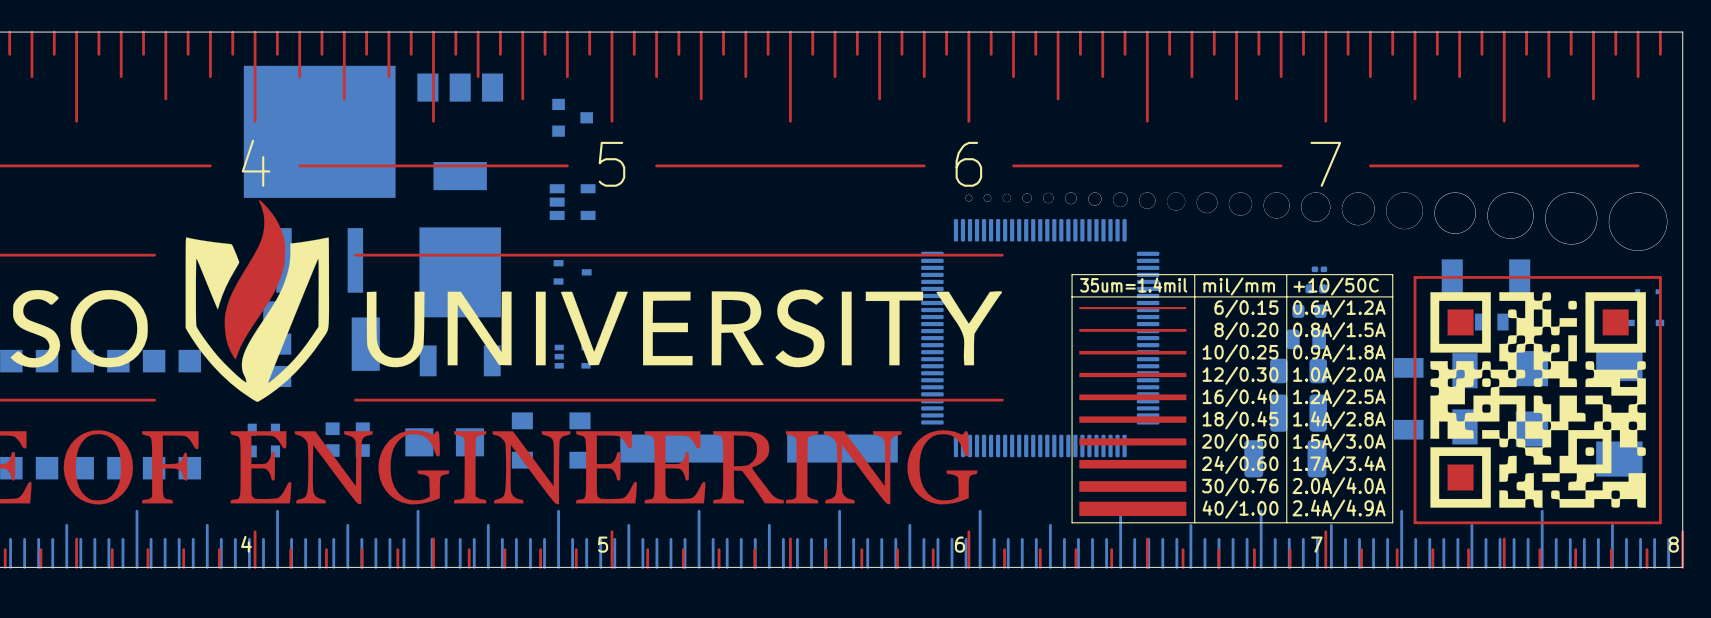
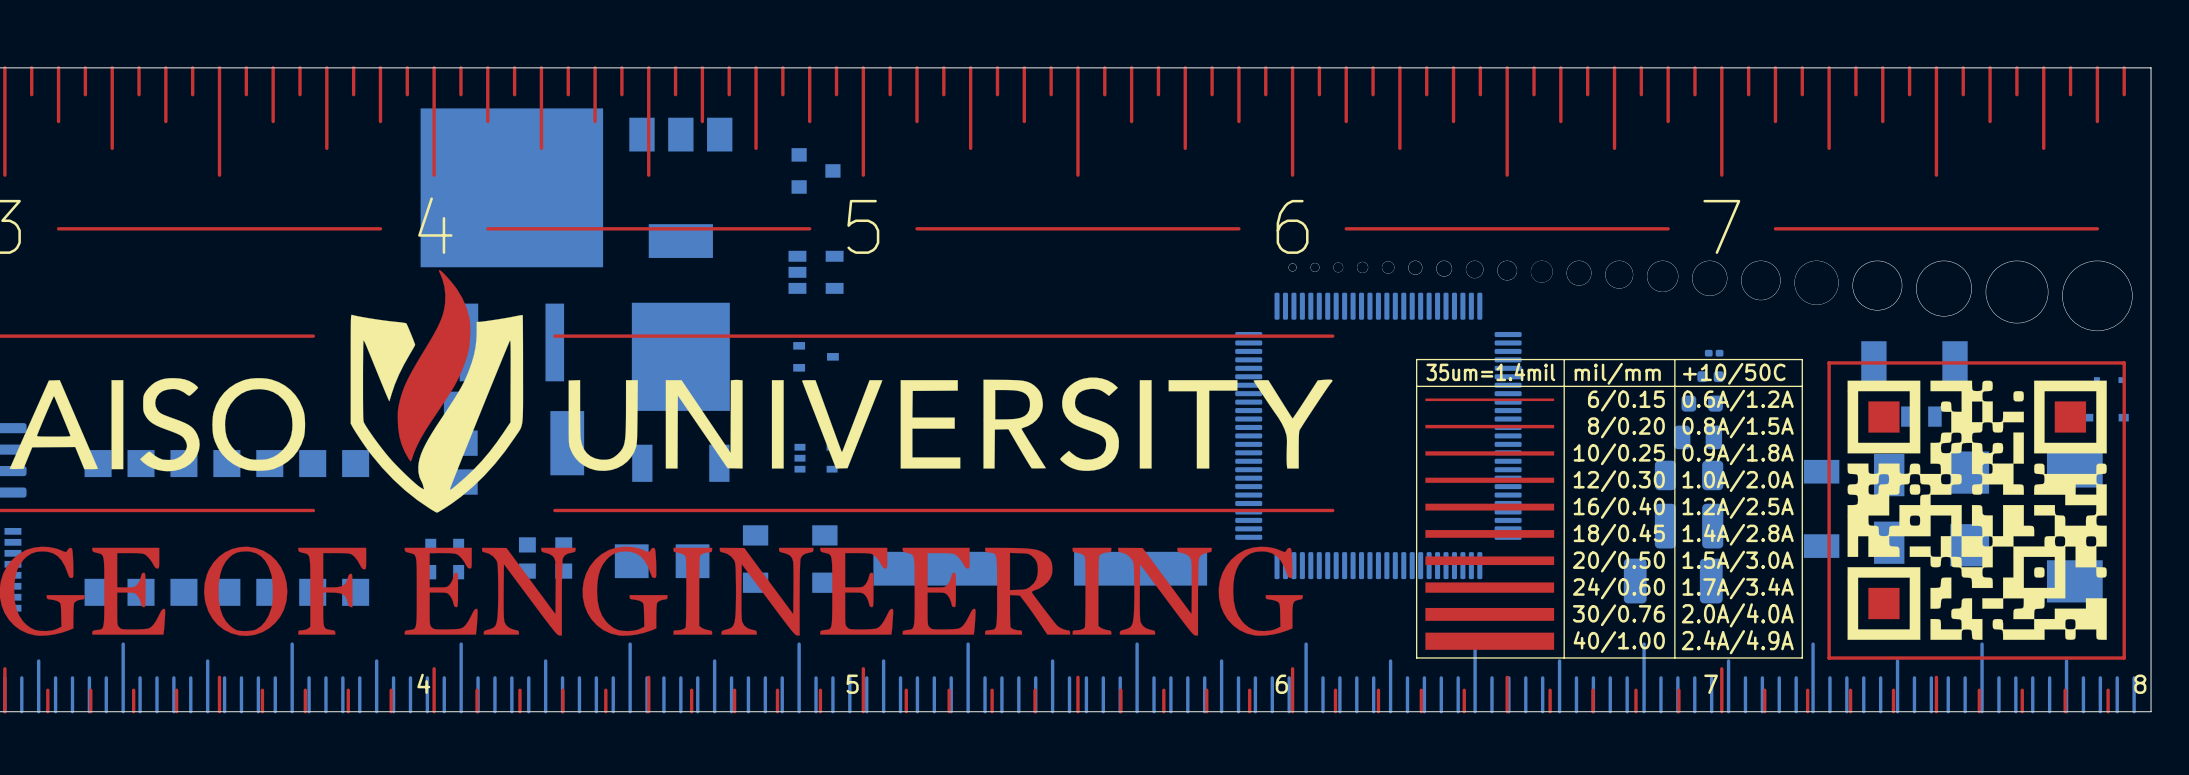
top track: (1682, 531) (1682, 567) -> none

